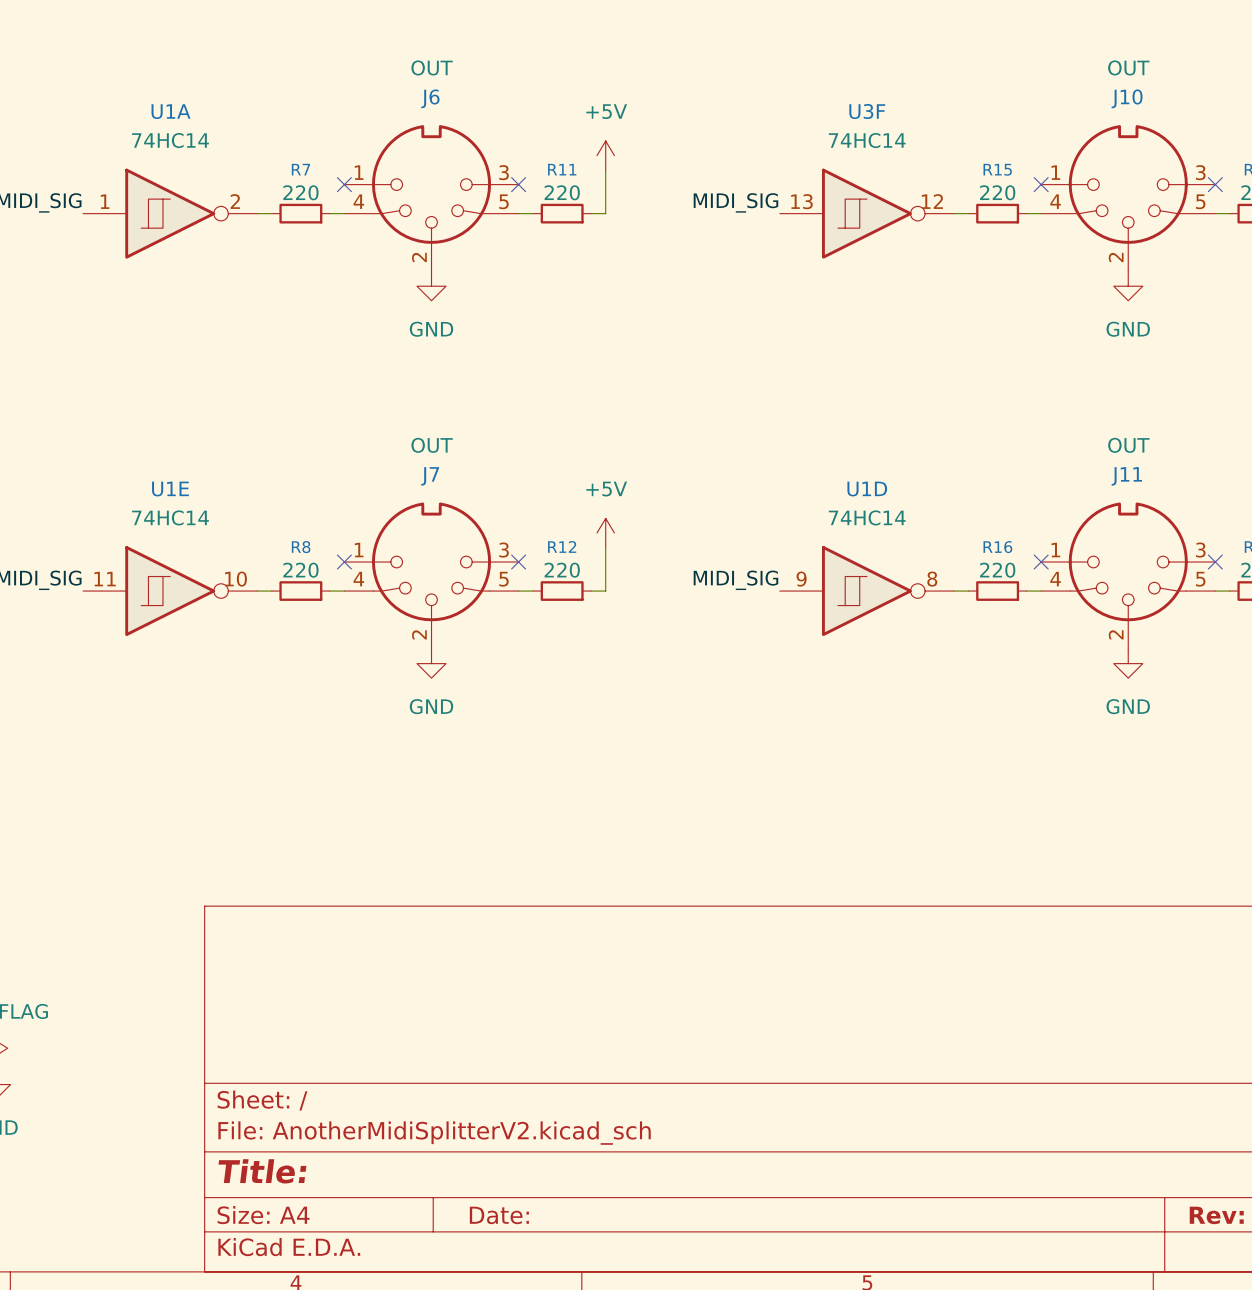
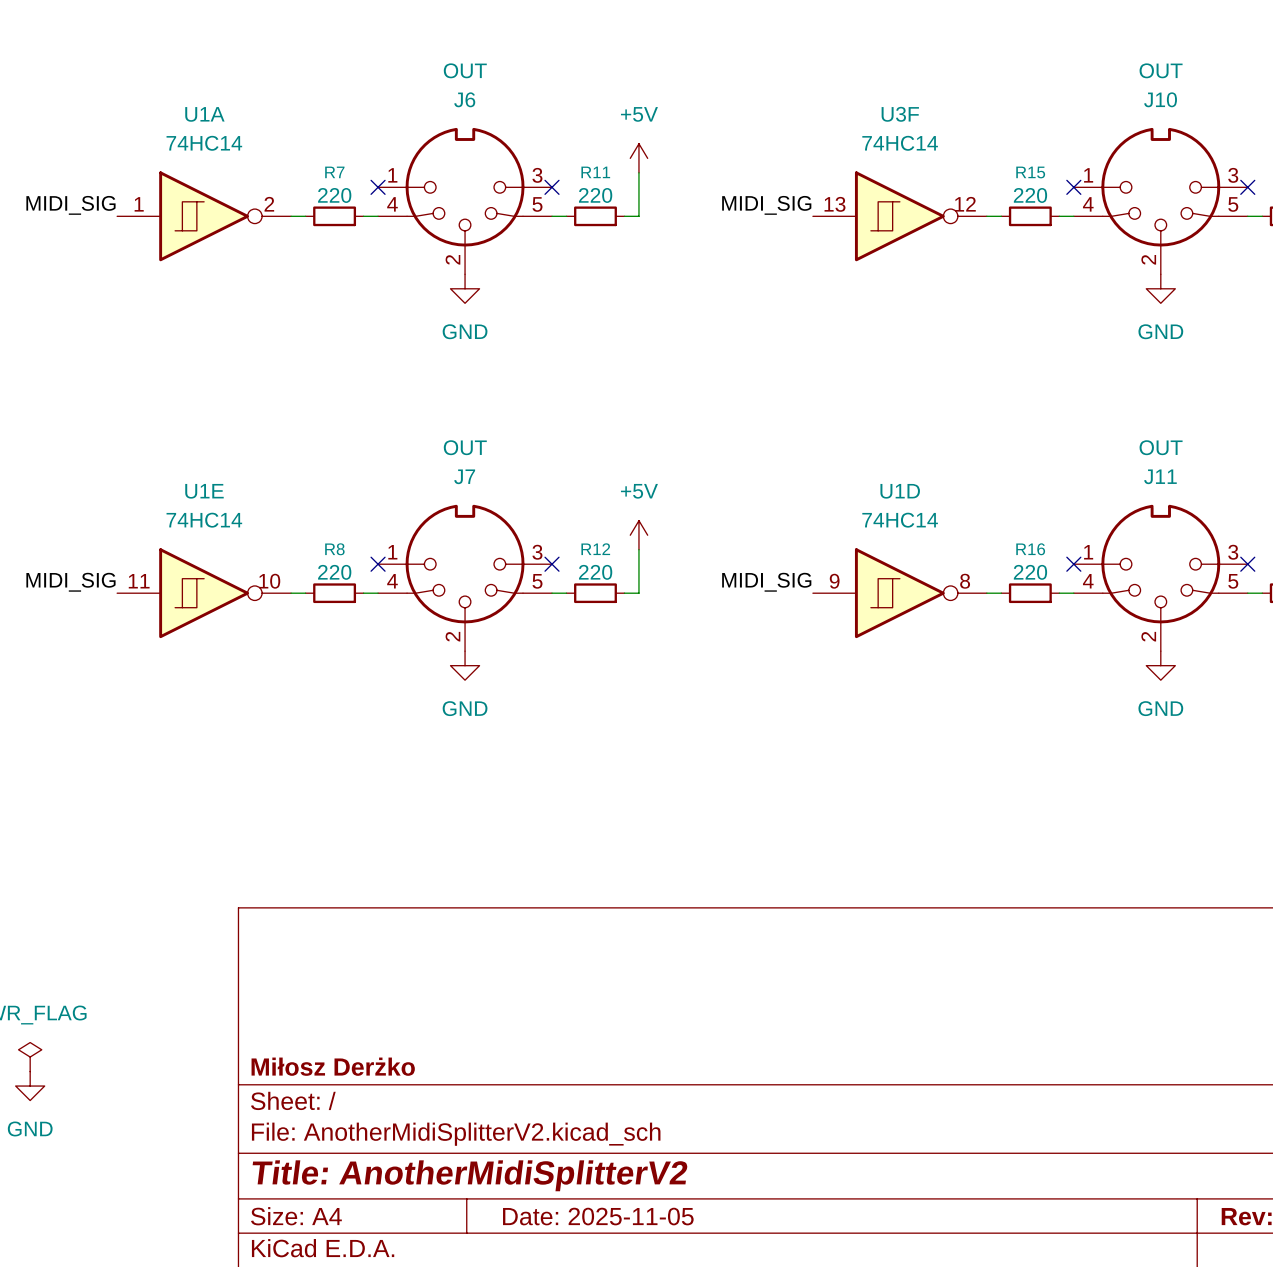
title block: none -> Miłosz Derżko (333, 1066)
title block: Title: (262, 1171) -> Title: AnotherMidiSplitterV2 (470, 1175)
title block: Date: (499, 1215) -> Date: 2025-11-05 (598, 1216)

